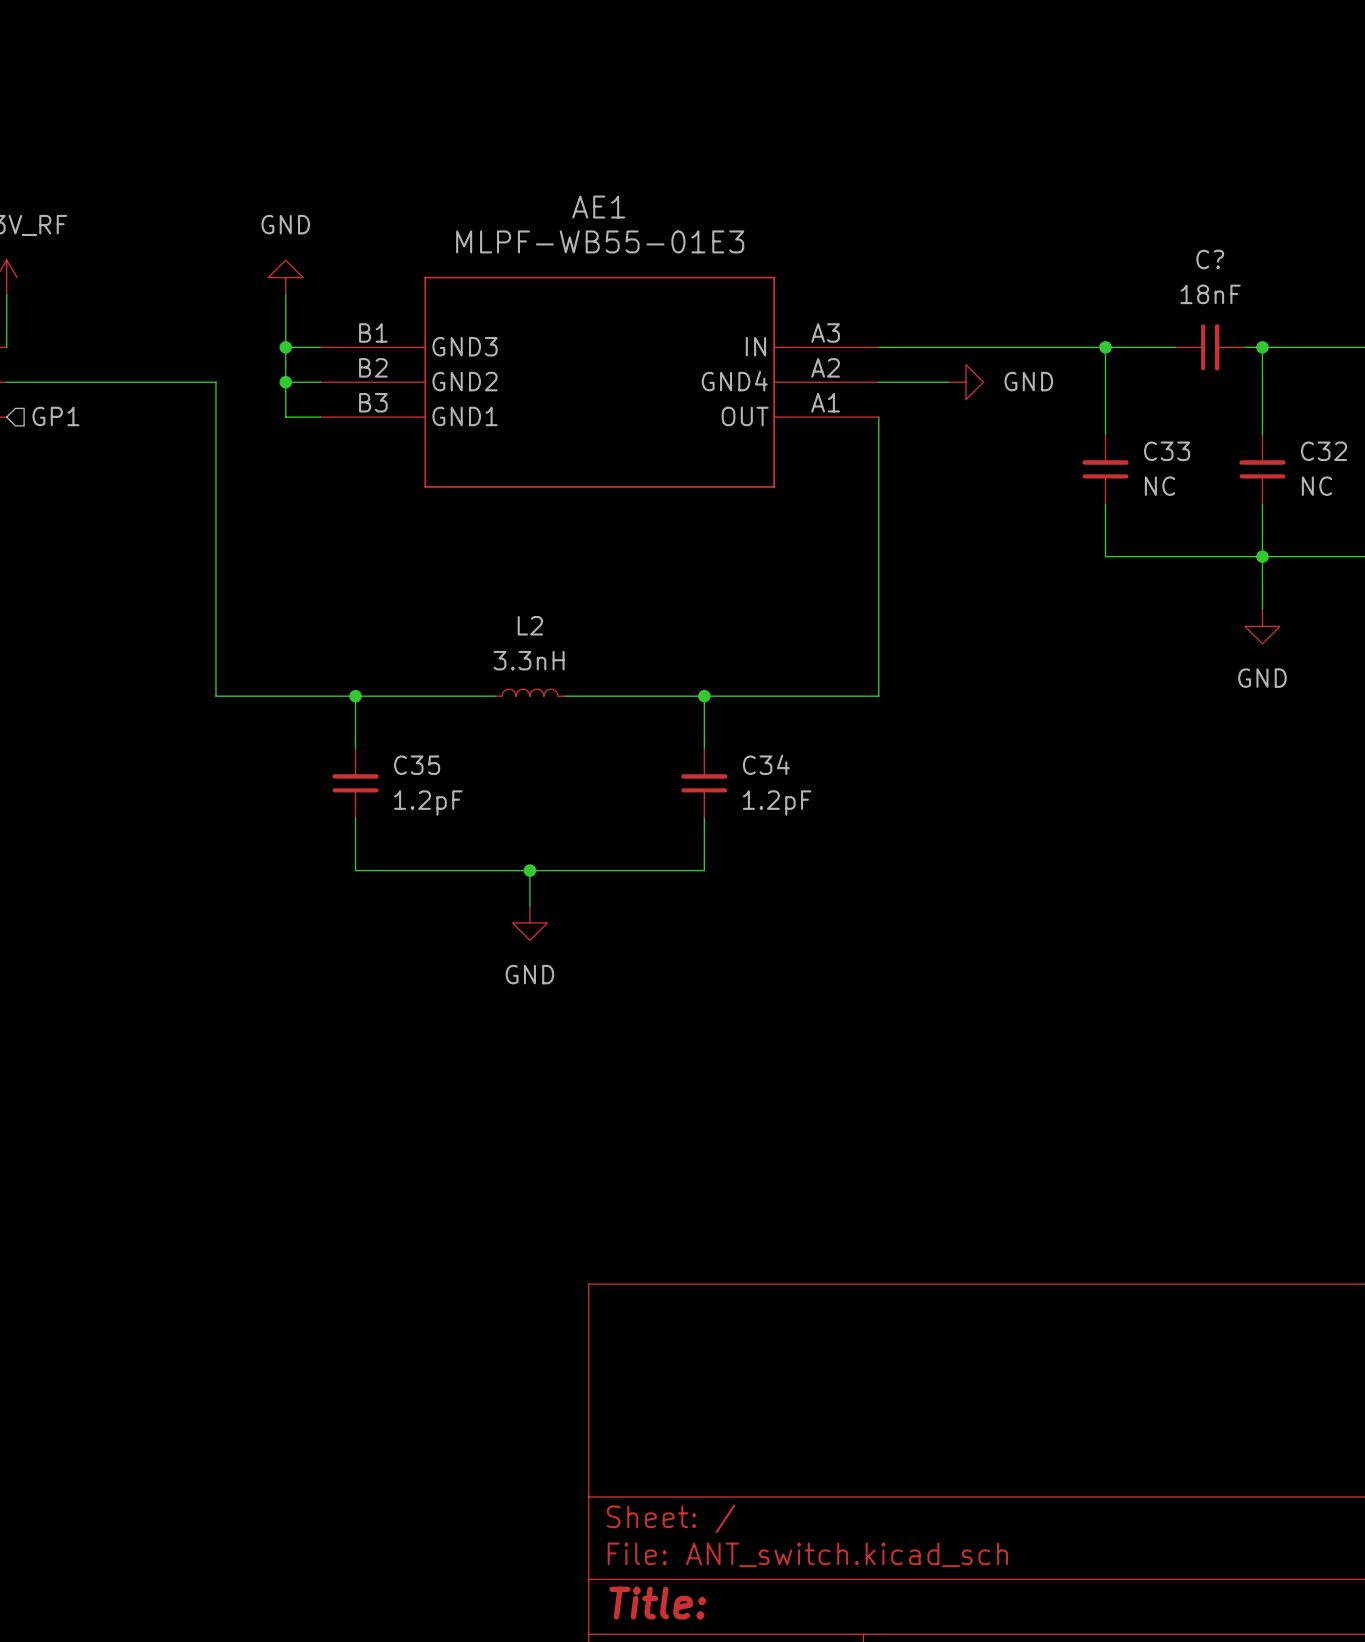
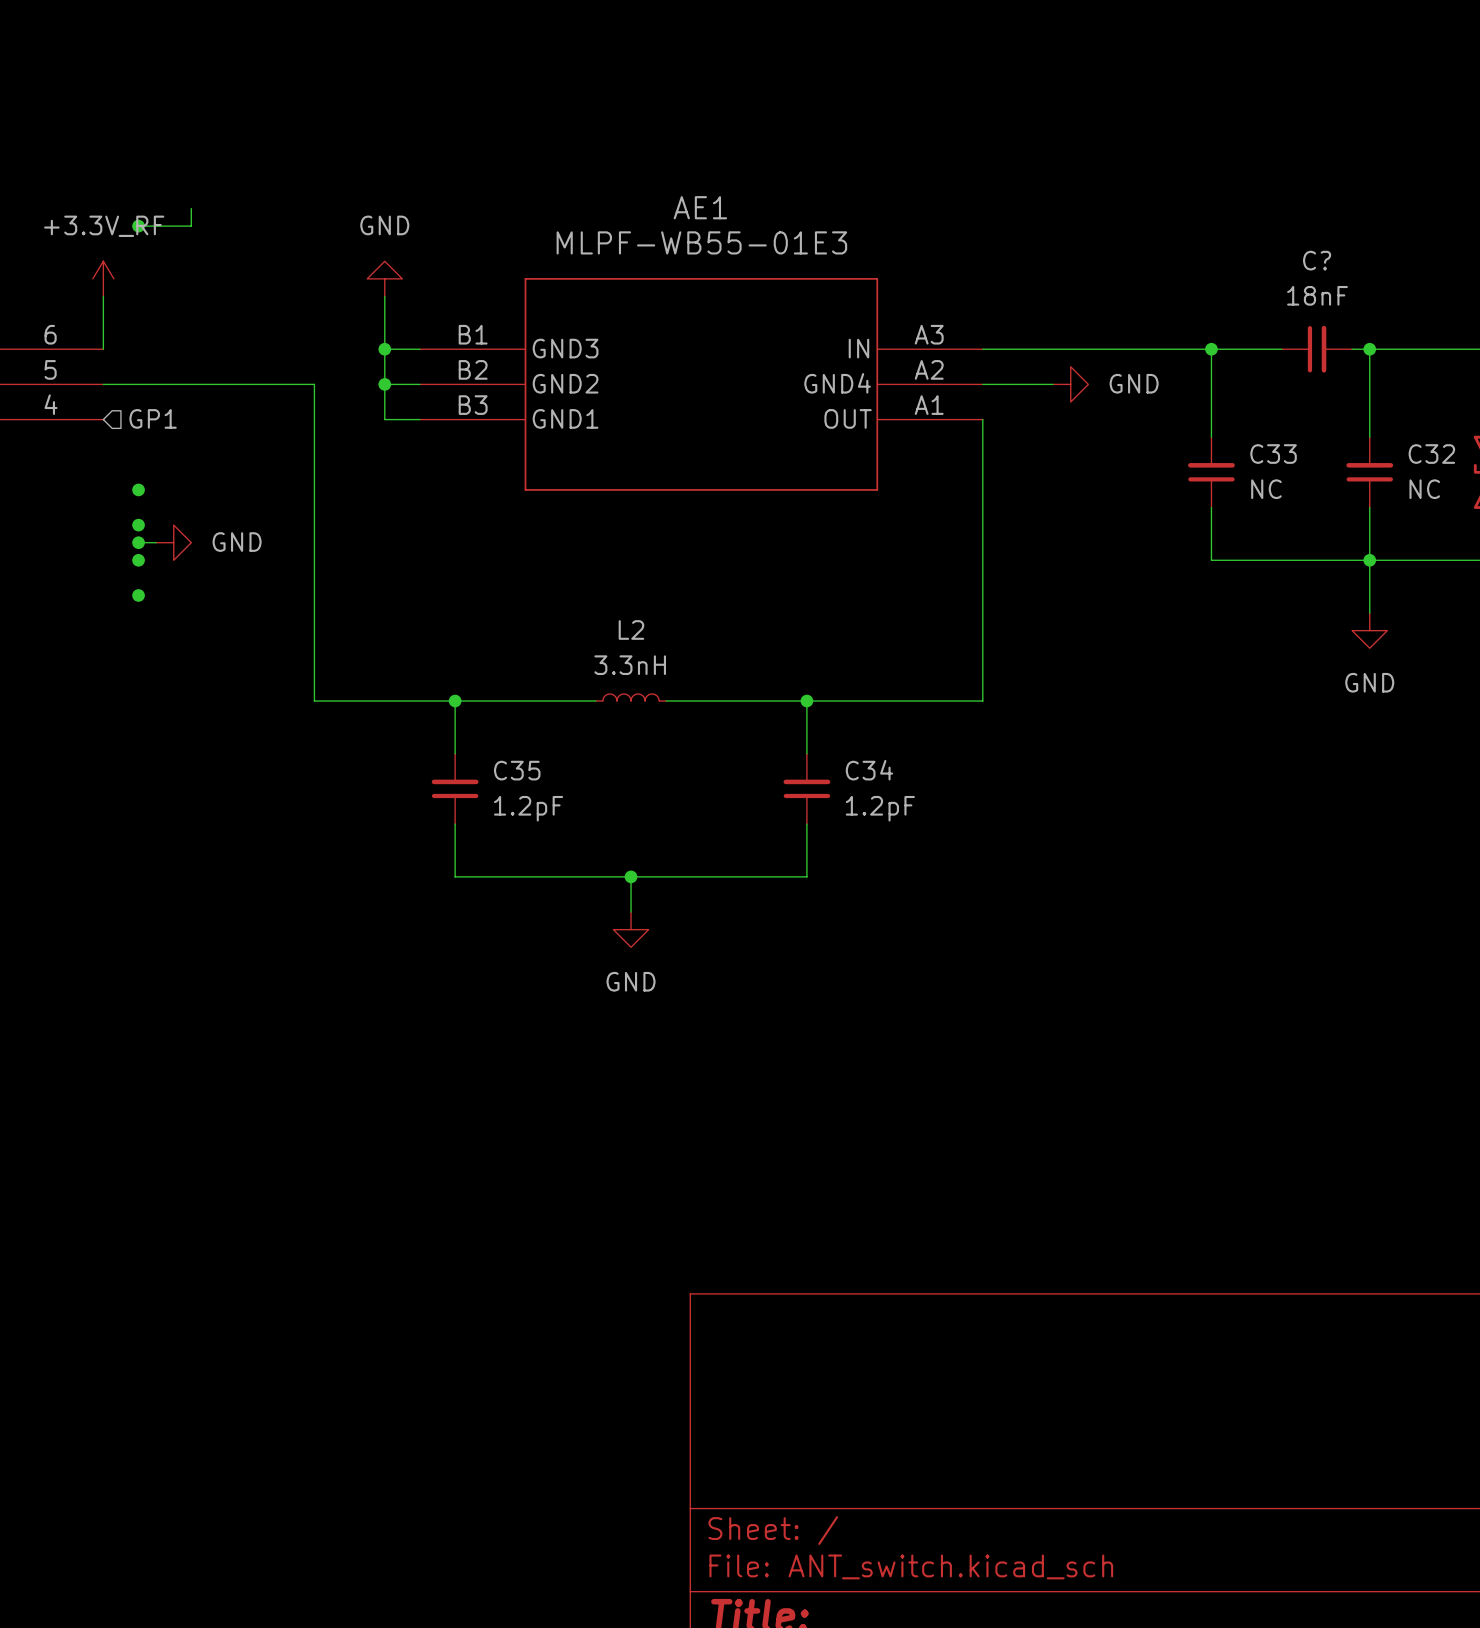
wire: none -> (191, 208) (191, 226) (138, 226)
junction: none -> (138, 226)
junction: none -> (138, 489)
junction: none -> (138, 525)
wire: none -> (138, 542) (156, 542)
junction: none -> (138, 542)
power symbol: none -> GND (173, 542)
junction: none -> (138, 560)
junction: none -> (138, 595)

